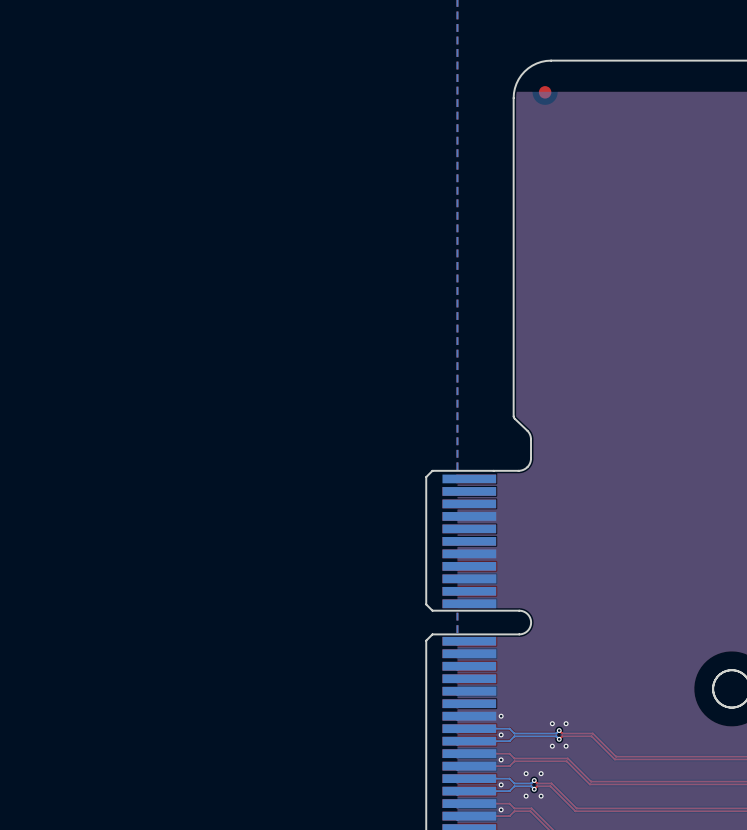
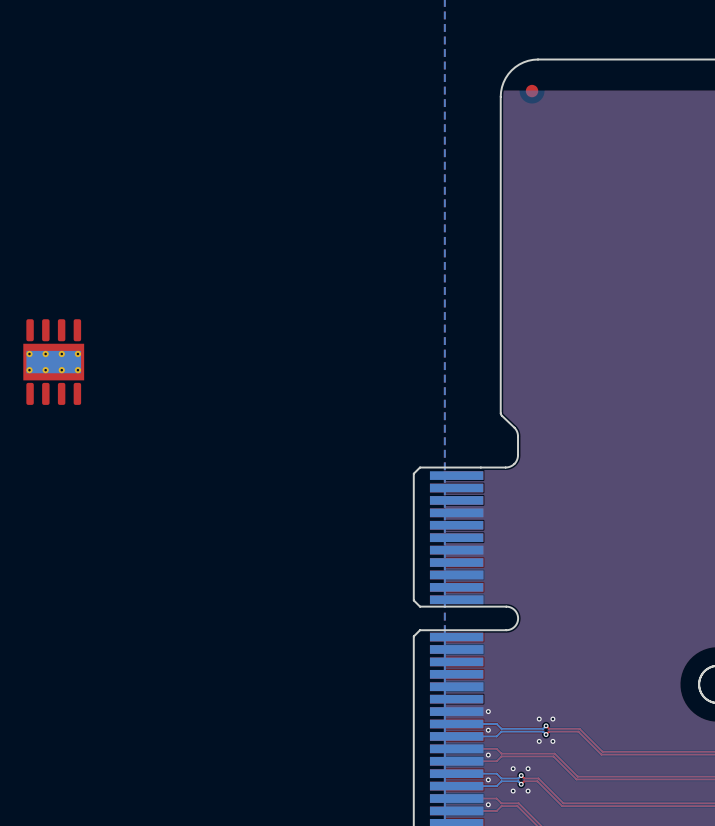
part: none -> (53, 362)

